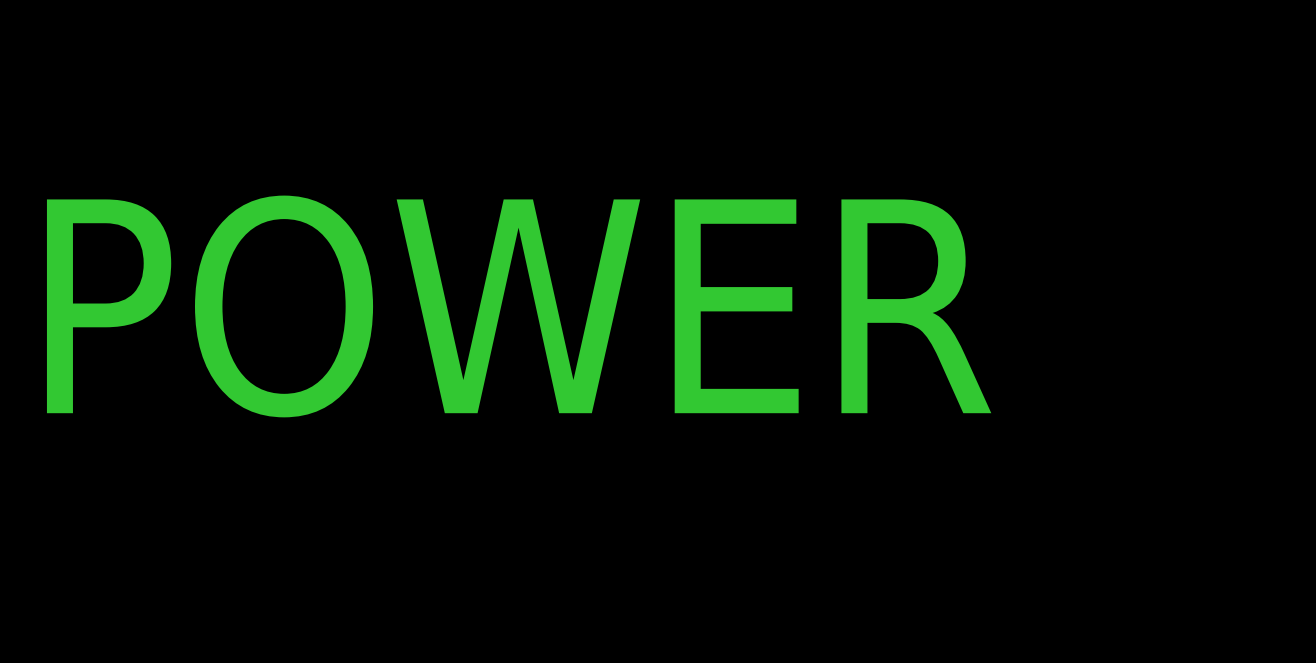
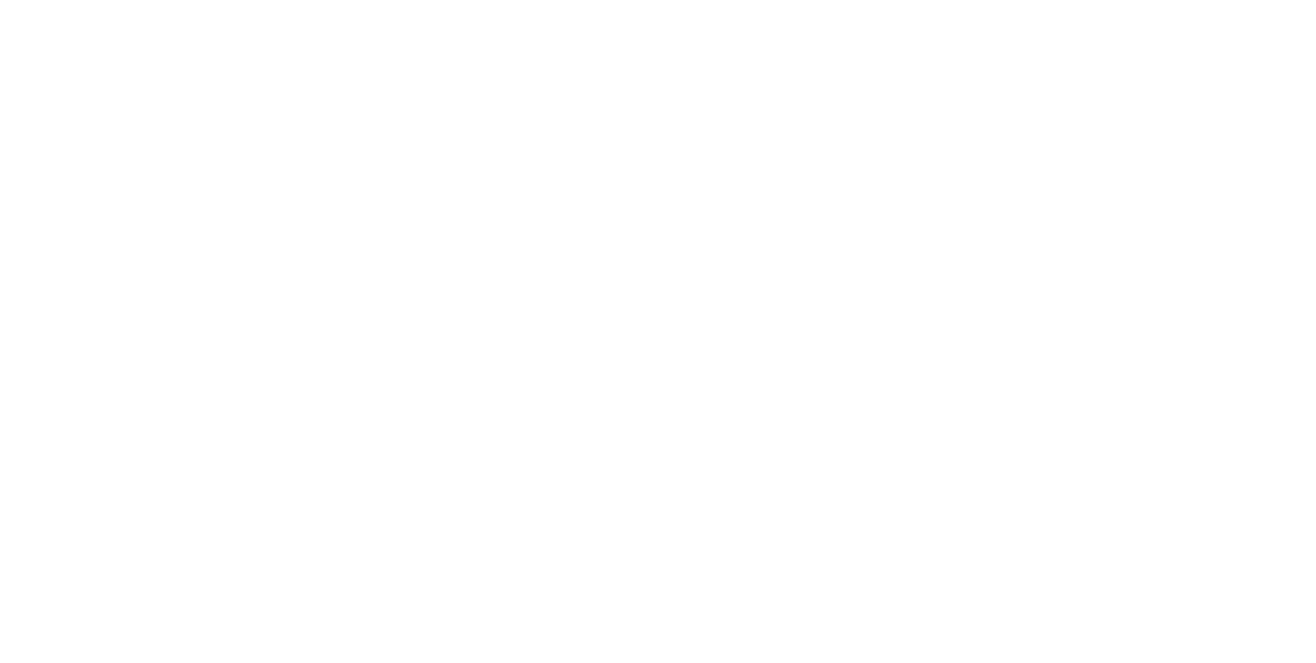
text: POWER (519, 306) -> none

